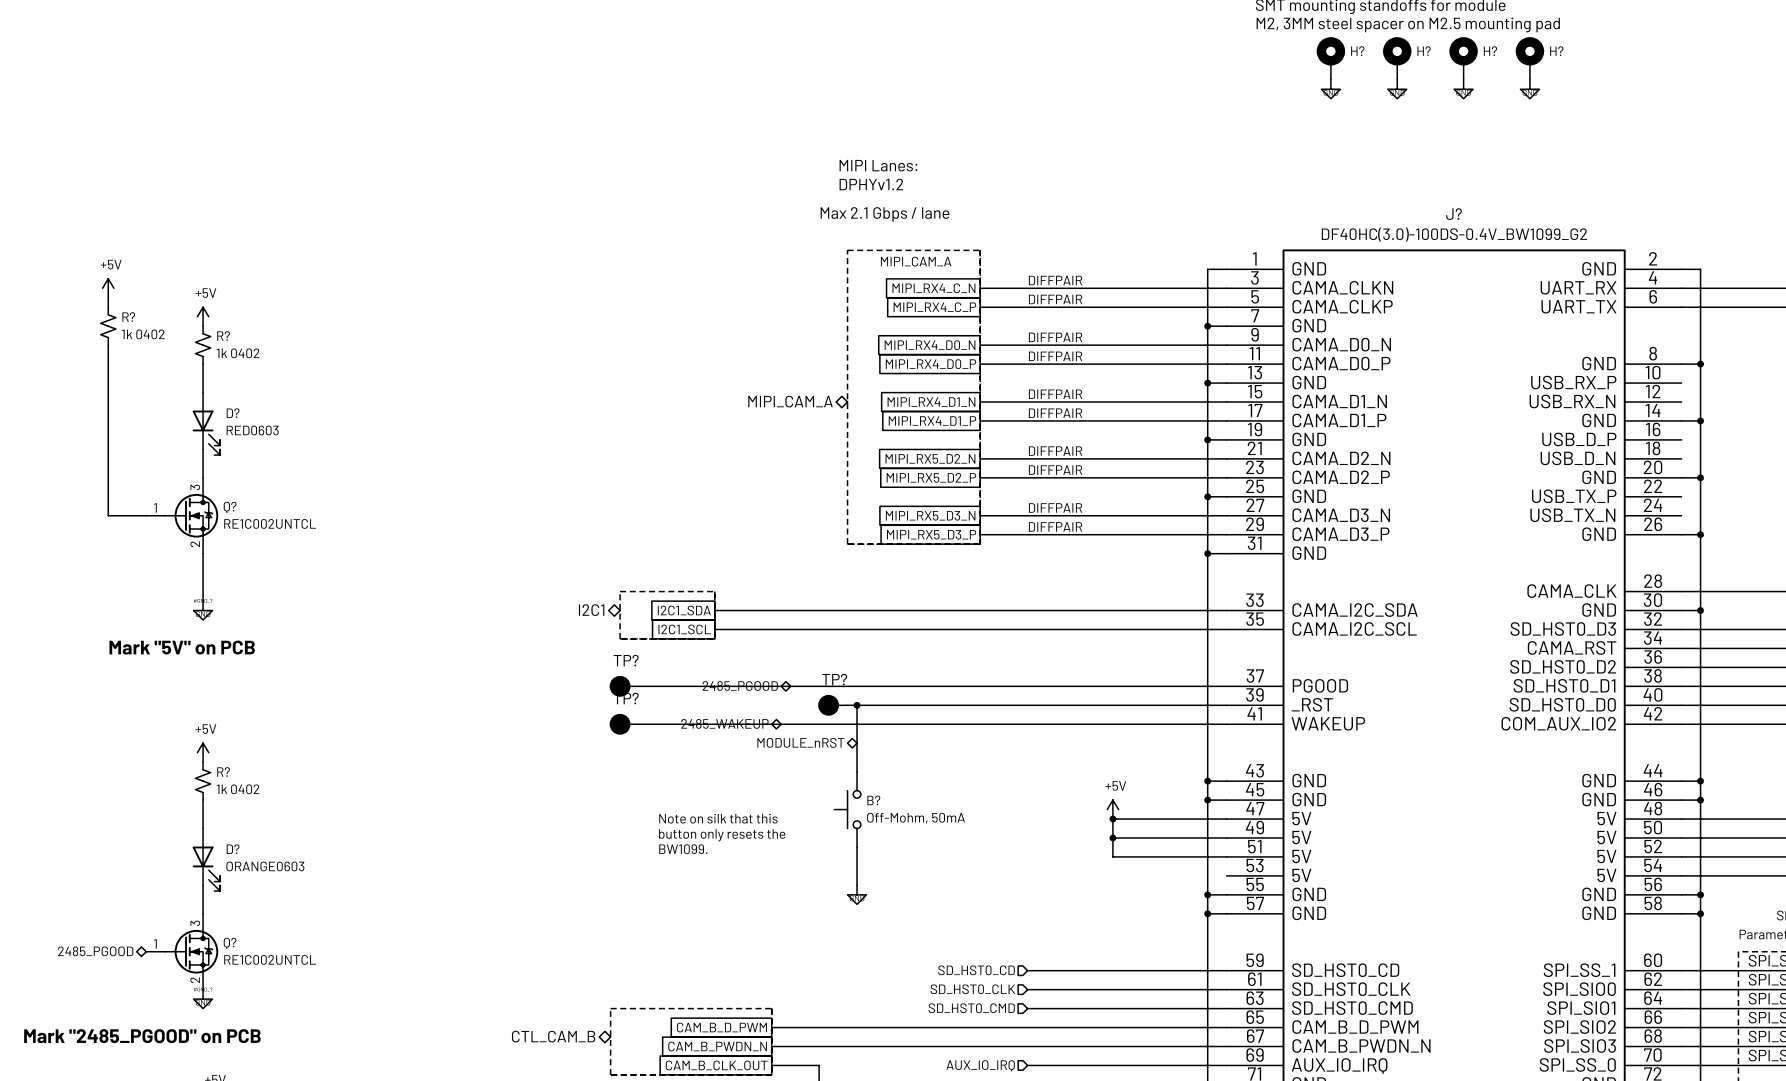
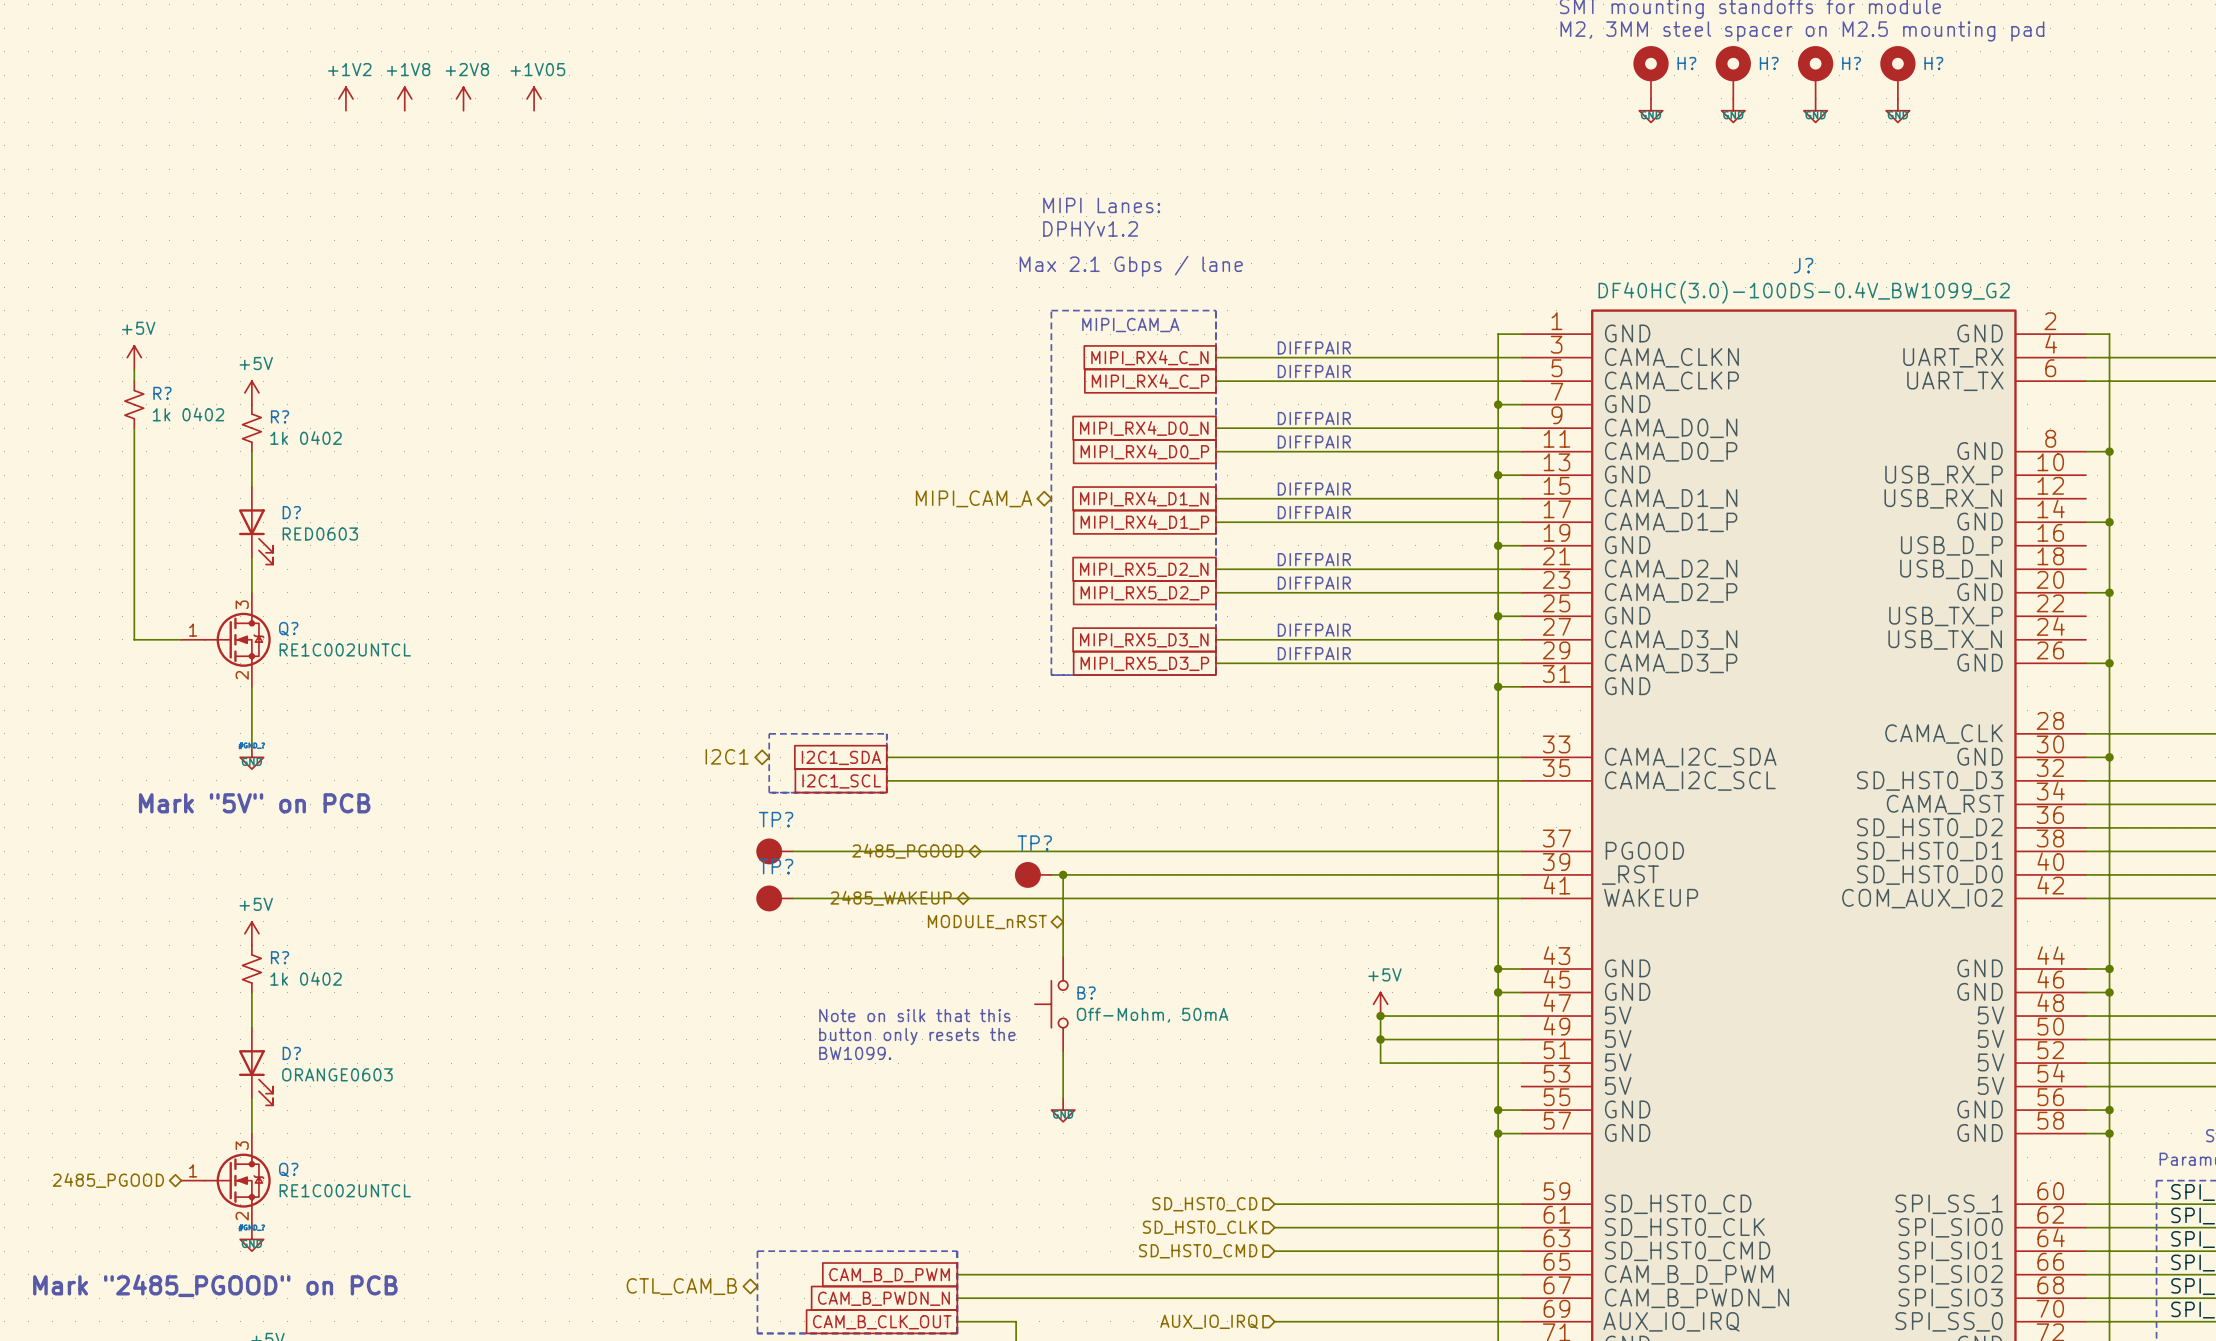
power symbol: none -> +1V2 (345, 98)
power symbol: none -> +1V8 (404, 98)
power symbol: none -> +2V8 (463, 98)
power symbol: none -> +1V05 (534, 98)

